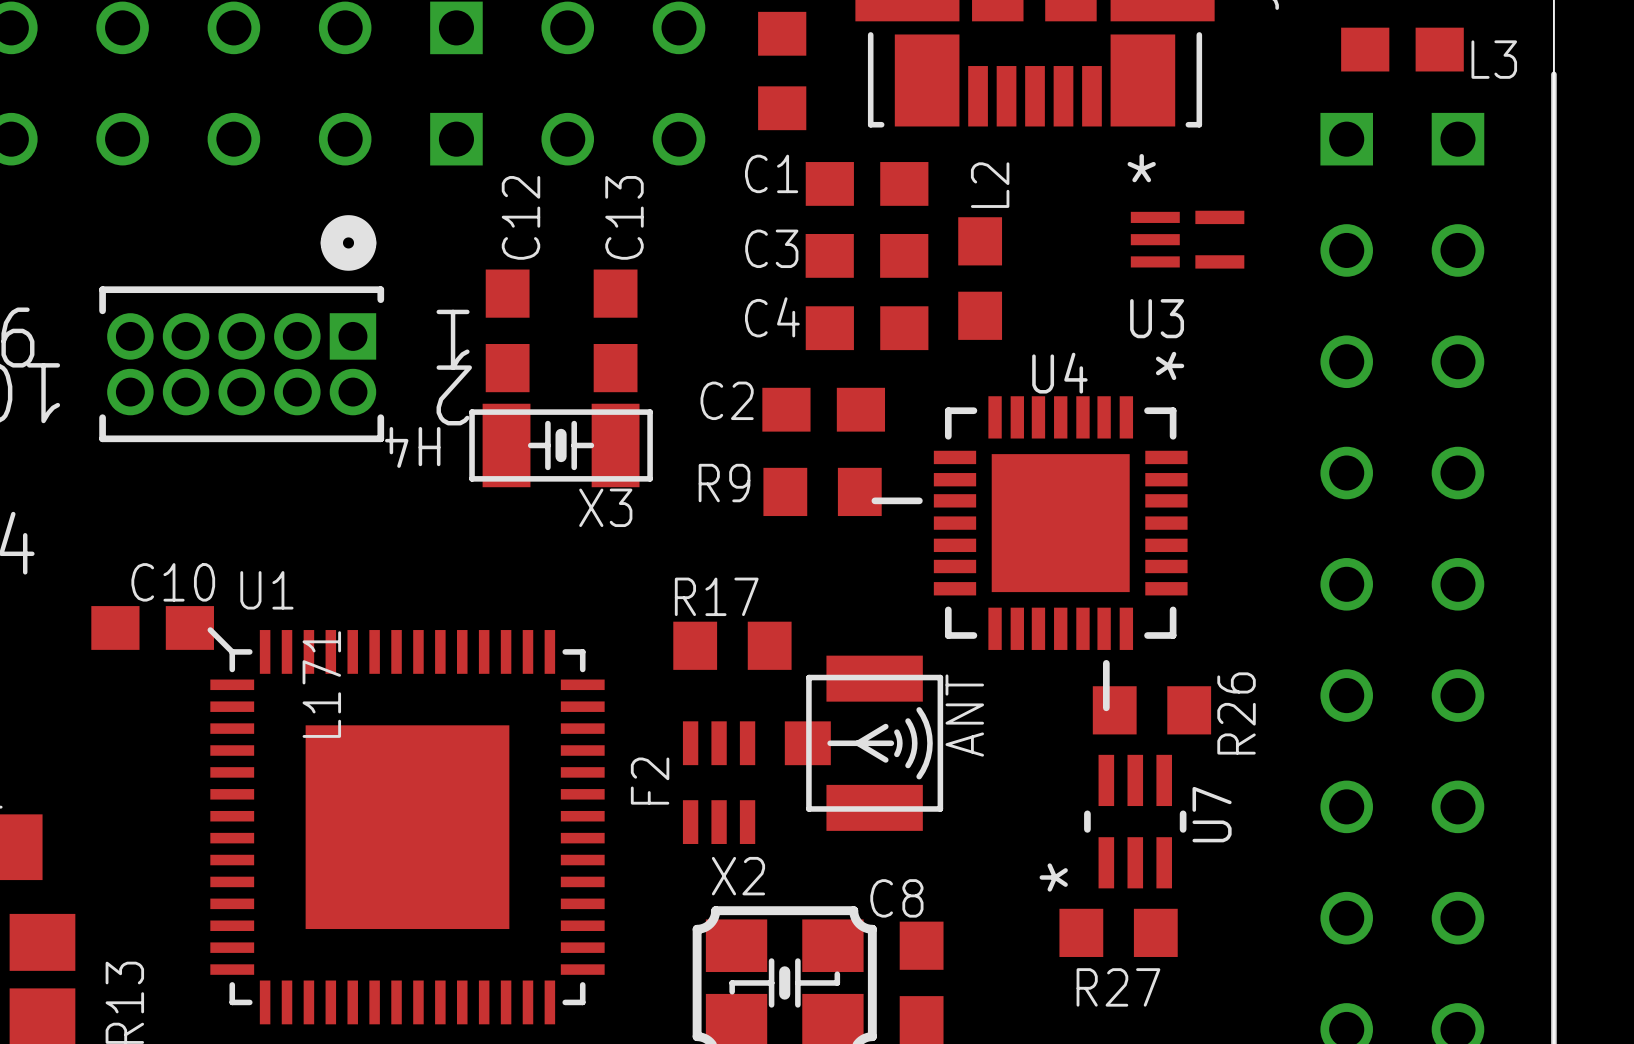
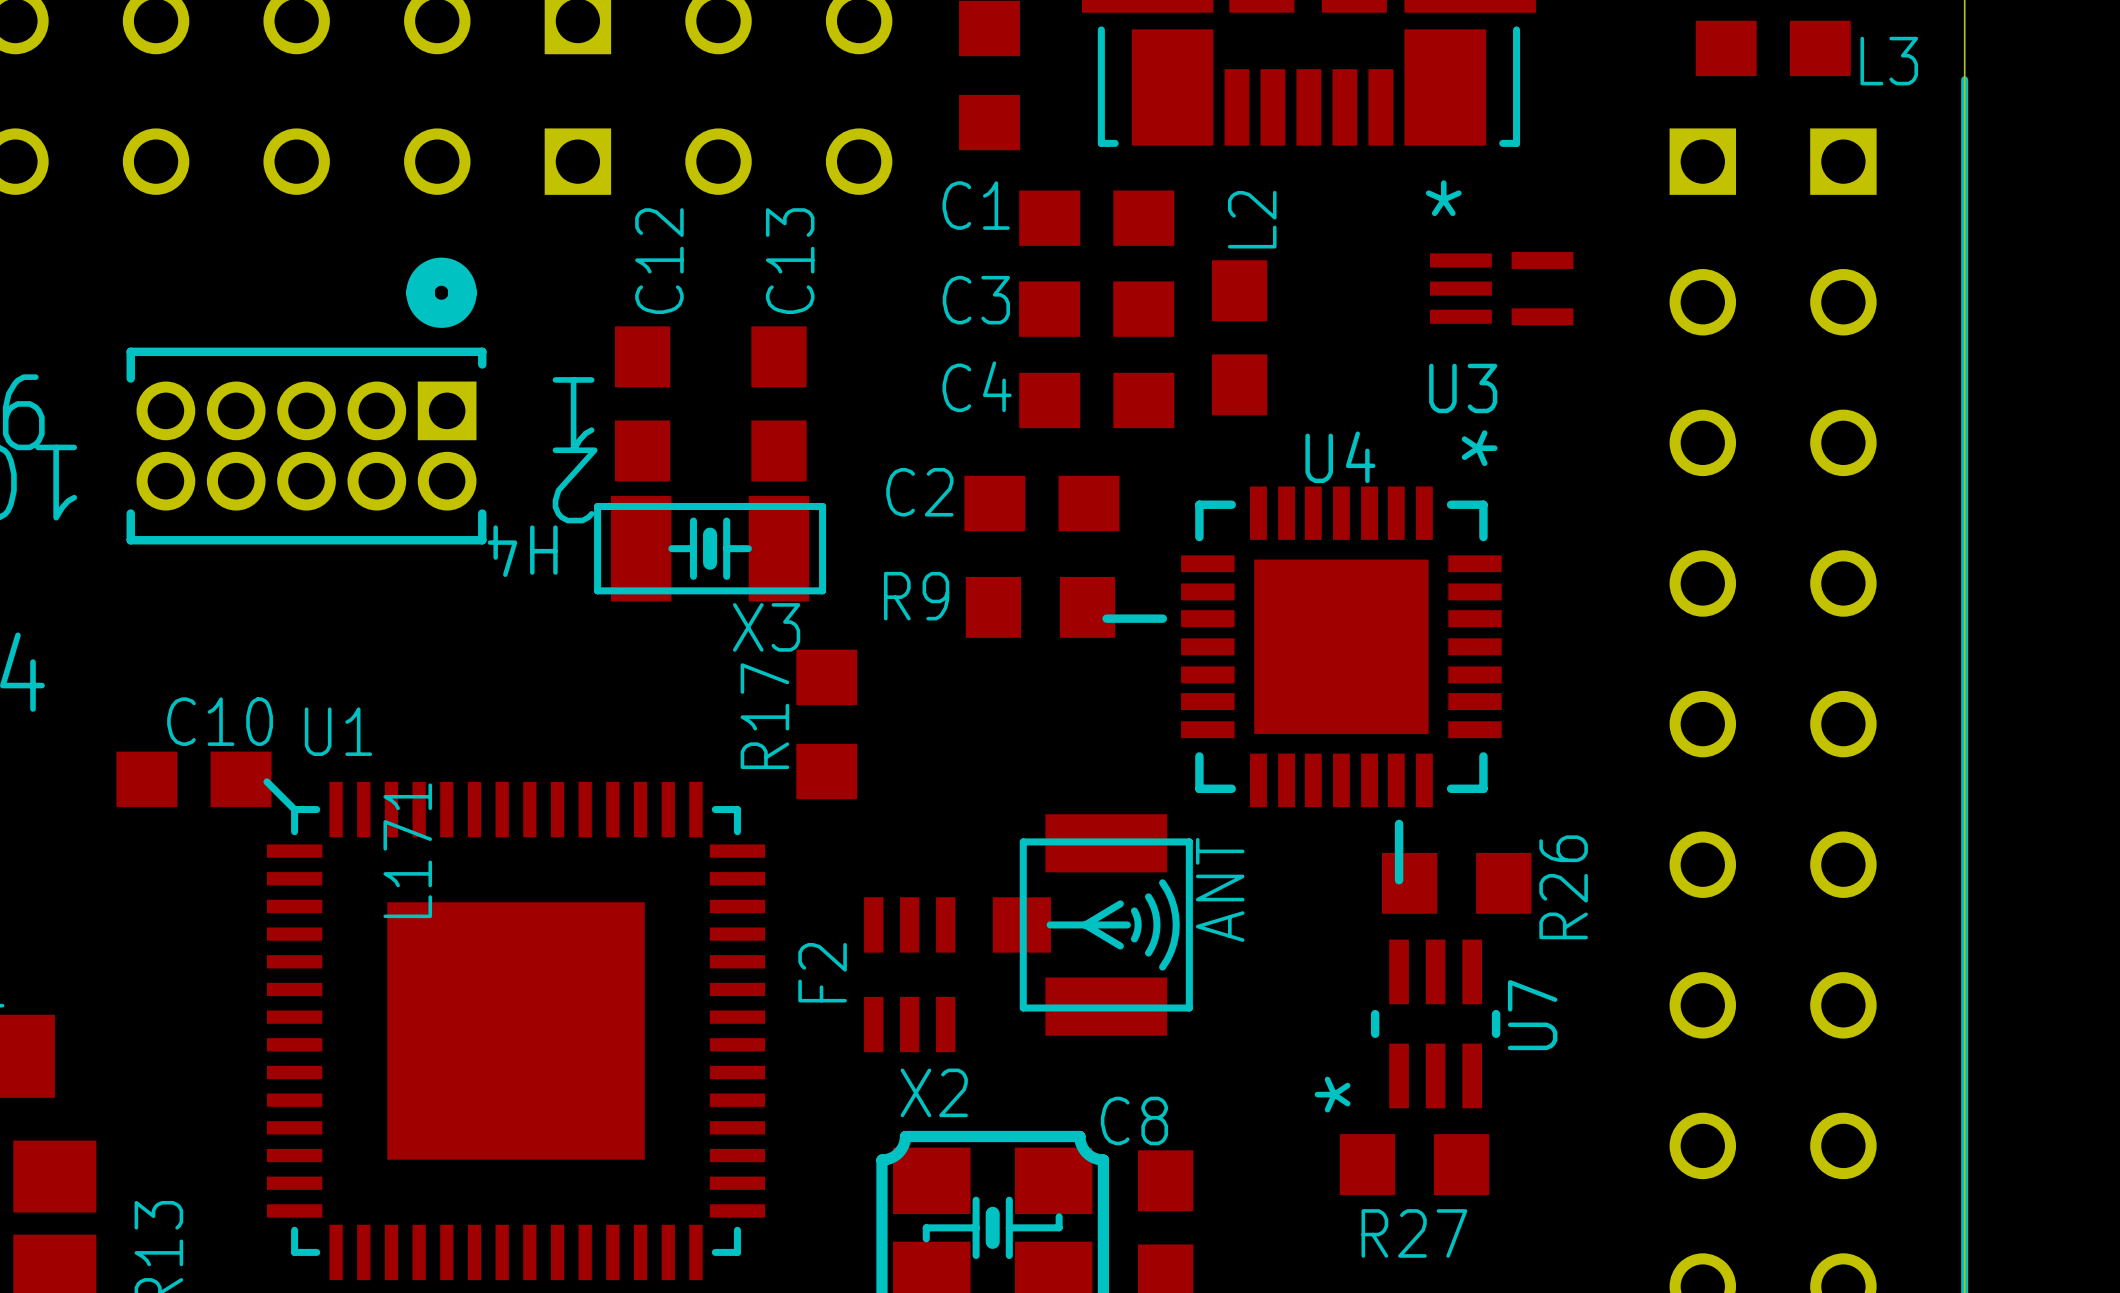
R17 rotation: 0° (732, 645) -> 90° clockwise (826, 724)
R17 position: (732, 645) -> (826, 724)

